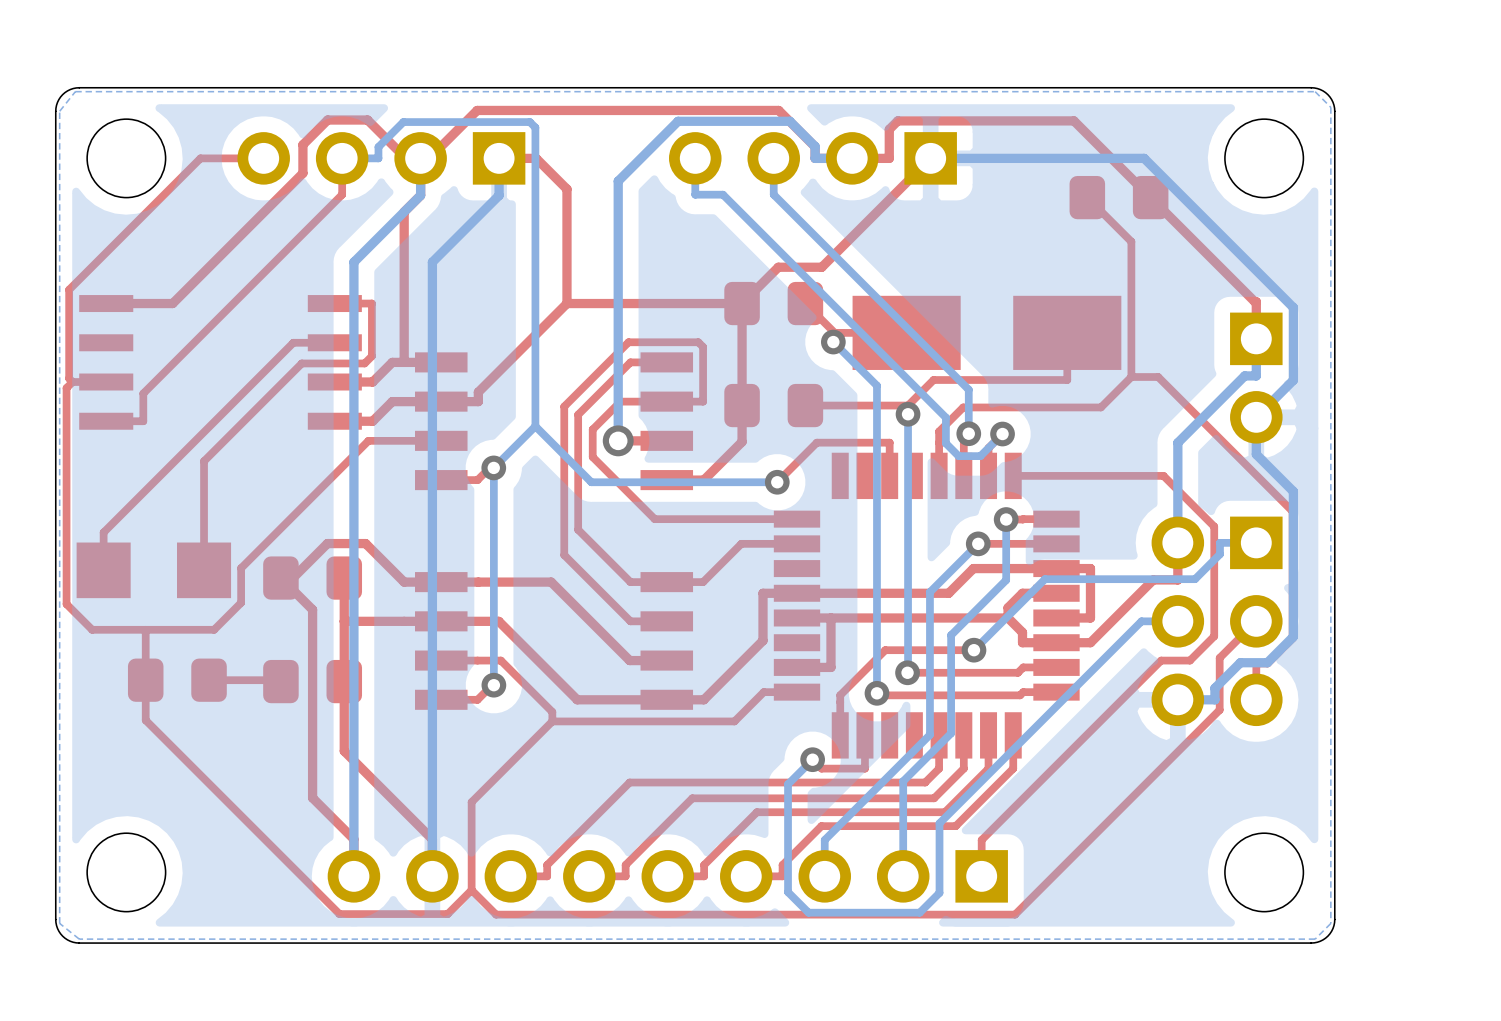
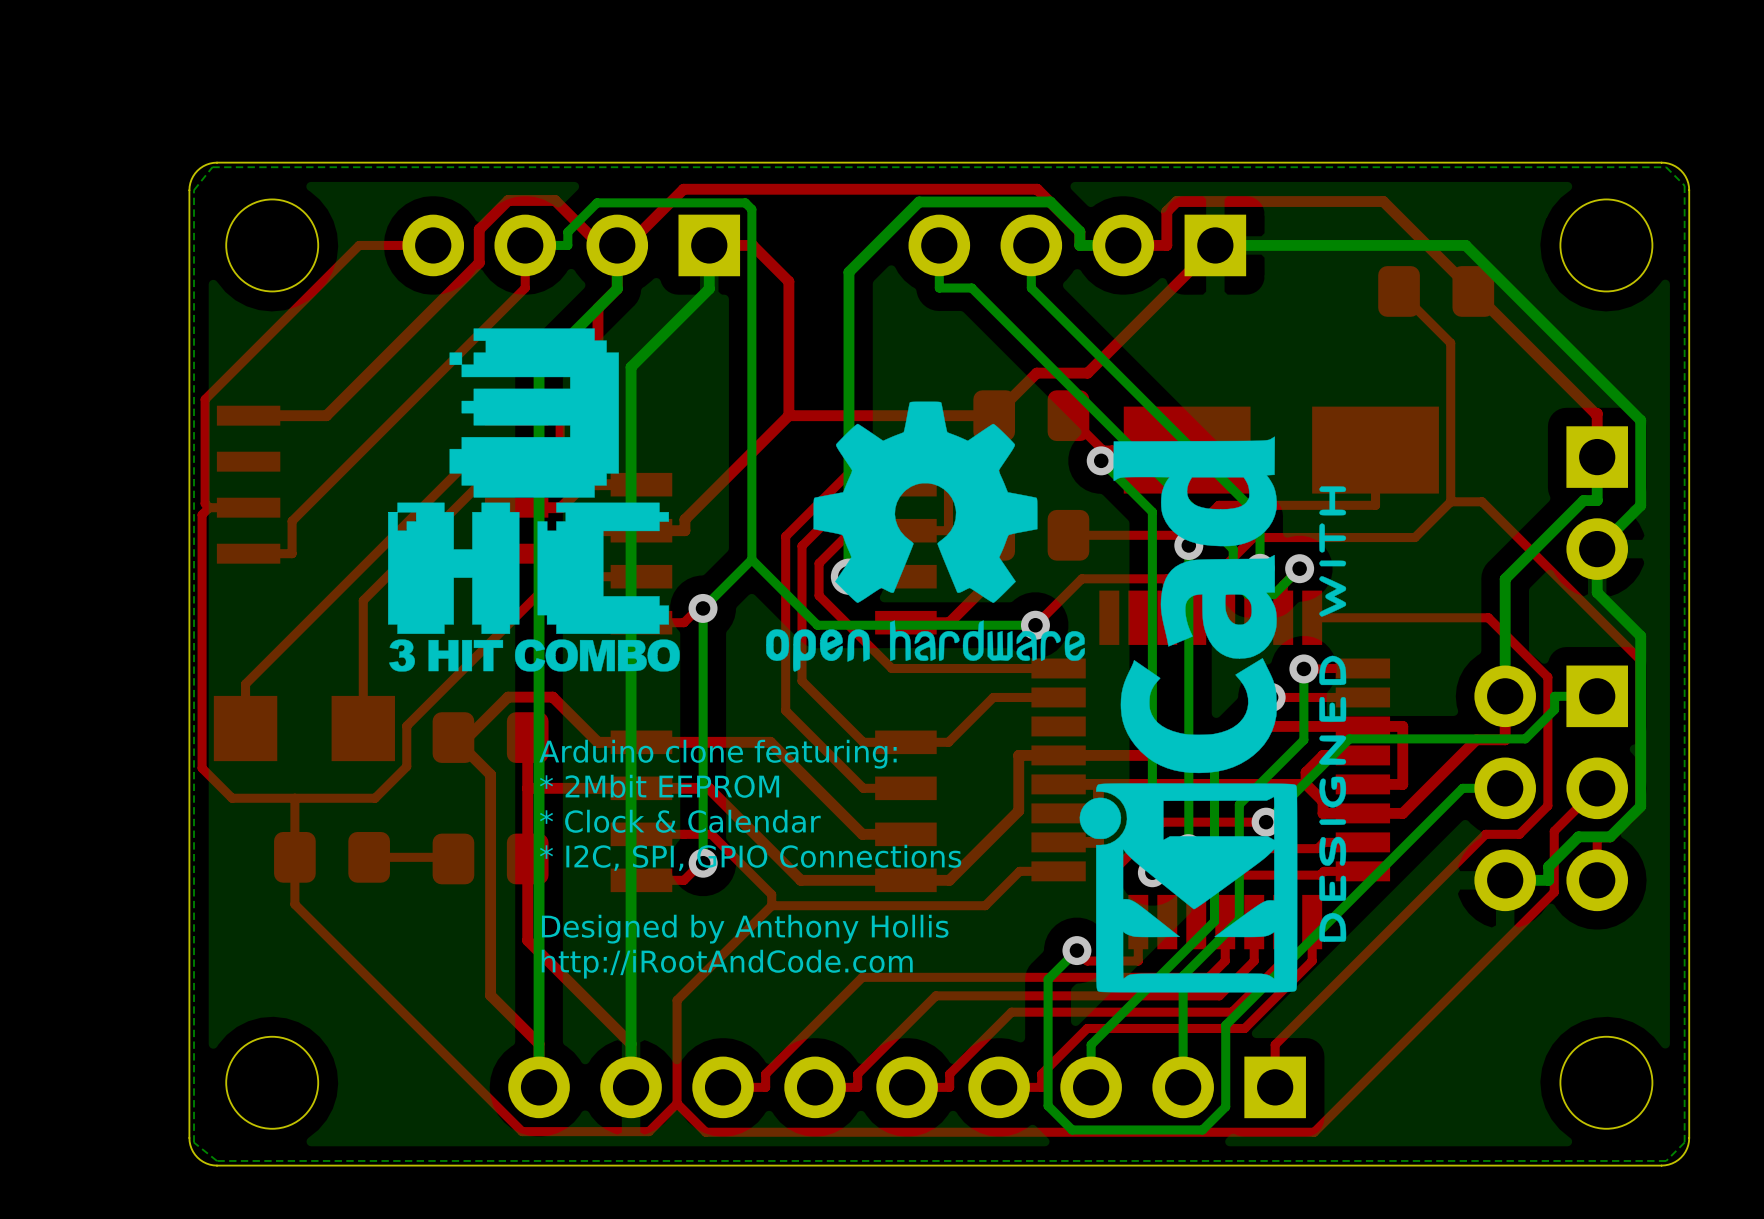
drawing: none -> [388, 328, 680, 672]
drawing: none -> [766, 401, 1347, 993]
text: none -> Arduino clone featuring: (717, 754)
text: none -> * 2Mbit EEPROM (659, 786)
text: none -> * Clock & Calendar (680, 821)
text: none -> * I2C, SPI, GPIO Connections (750, 857)
text: none -> Designed by Anthony Hollis (745, 929)
text: none -> http://iRootAndCode.com (727, 964)

